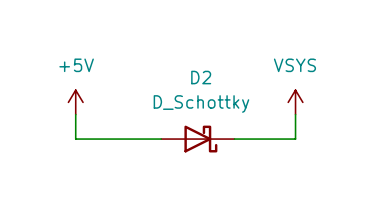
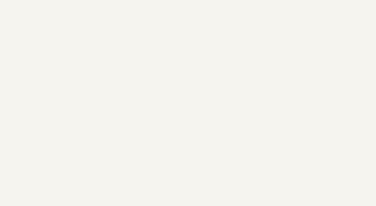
power symbol: +5V (75, 102) -> none
power symbol: VSYS (295, 102) -> none
wire: (75, 114) (75, 139) (161, 139) -> none
wire: (295, 114) (295, 139) (234, 139) -> none
D2: D_Schottky (197, 139) -> none

